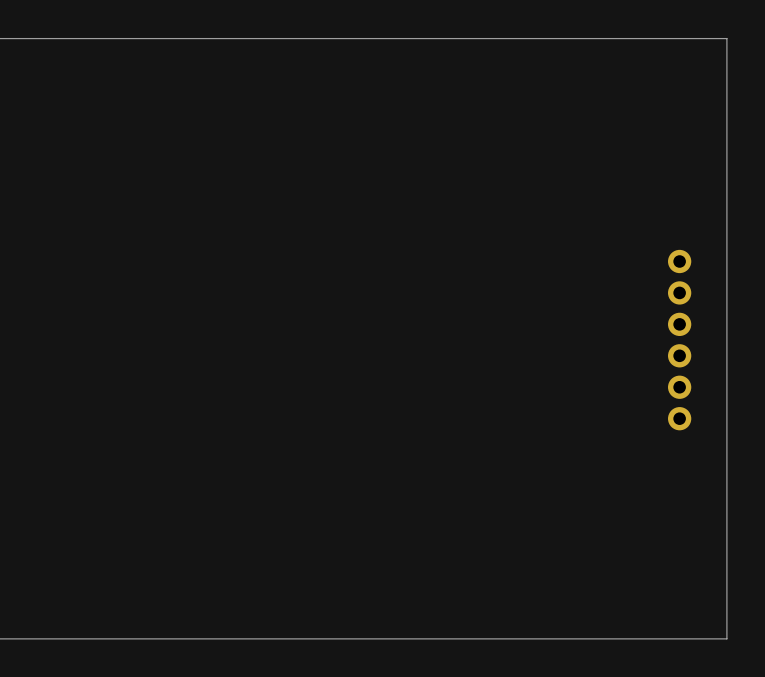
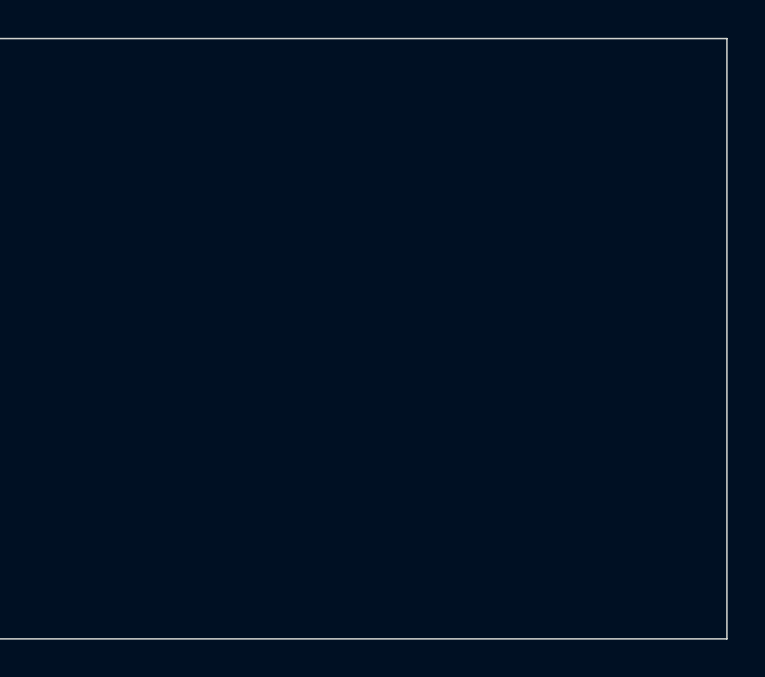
part: (679, 340) -> none

